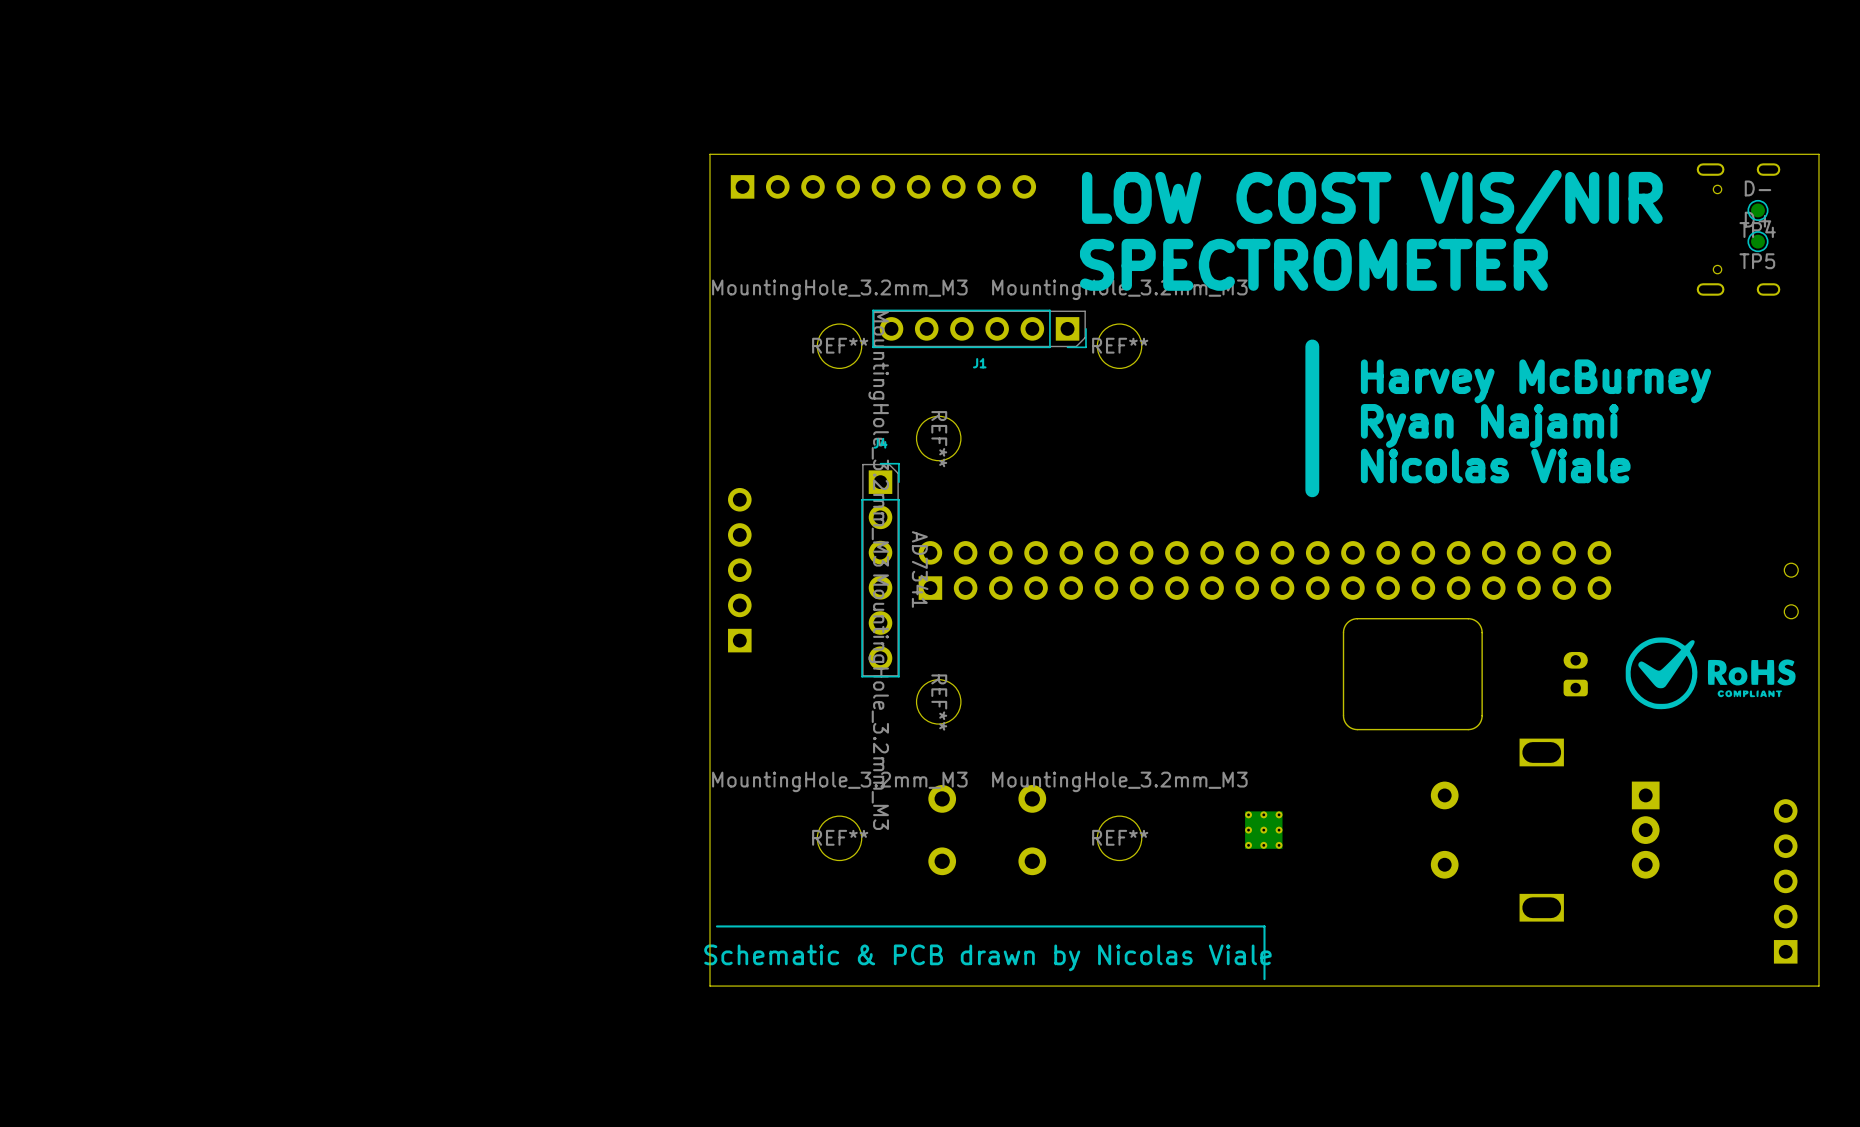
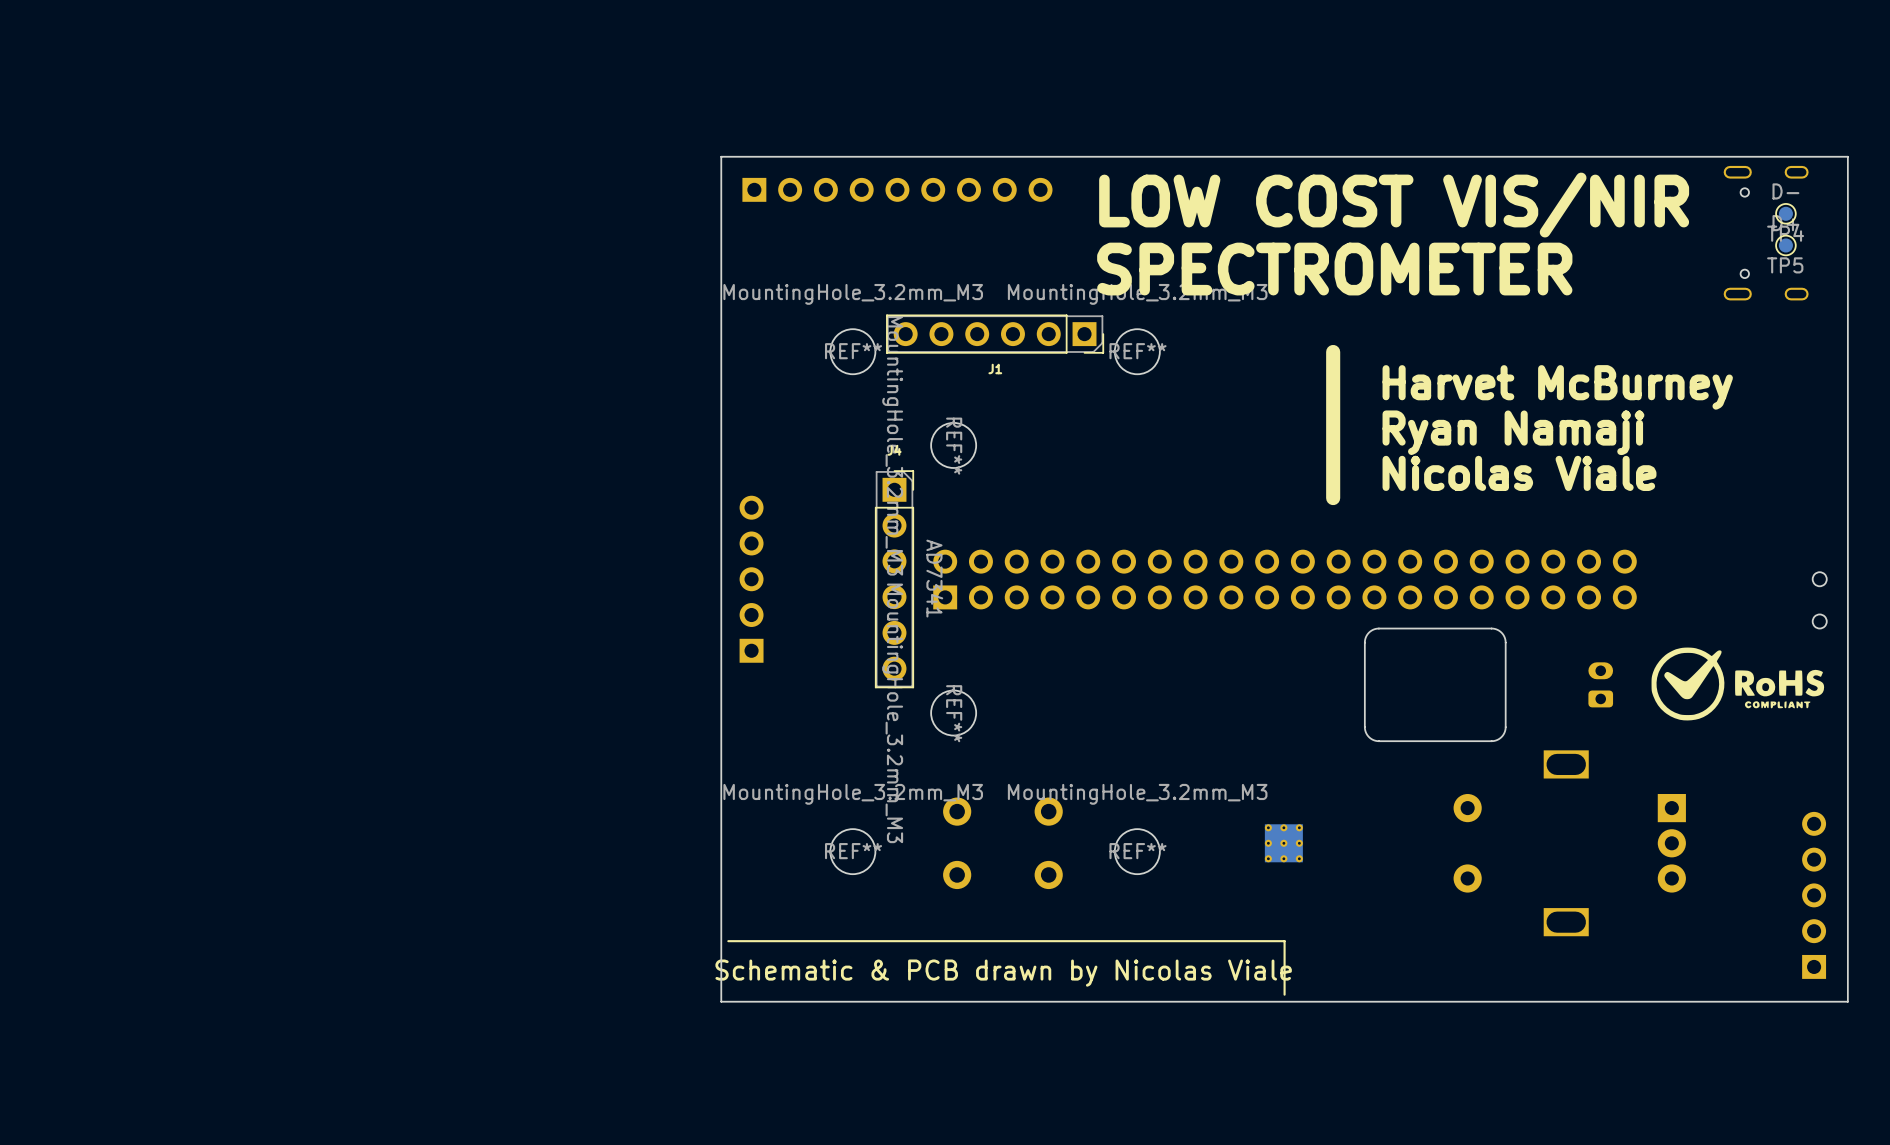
text: Harvey McBurney (1536, 381) -> Harvet McBurney (1557, 387)
text: Ryan Najami (1489, 425) -> Ryan Namaji (1513, 432)

